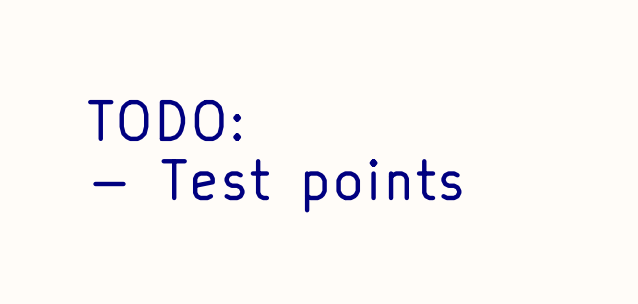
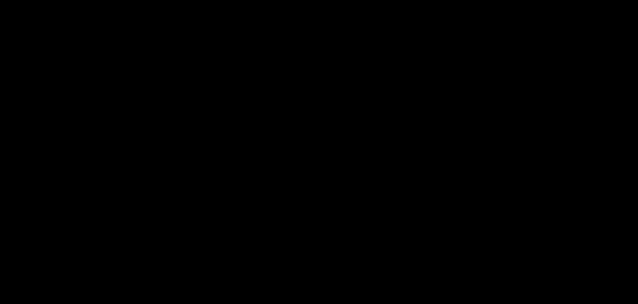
text: TODO: (164, 120) -> none
text: - Test points (277, 185) -> none

